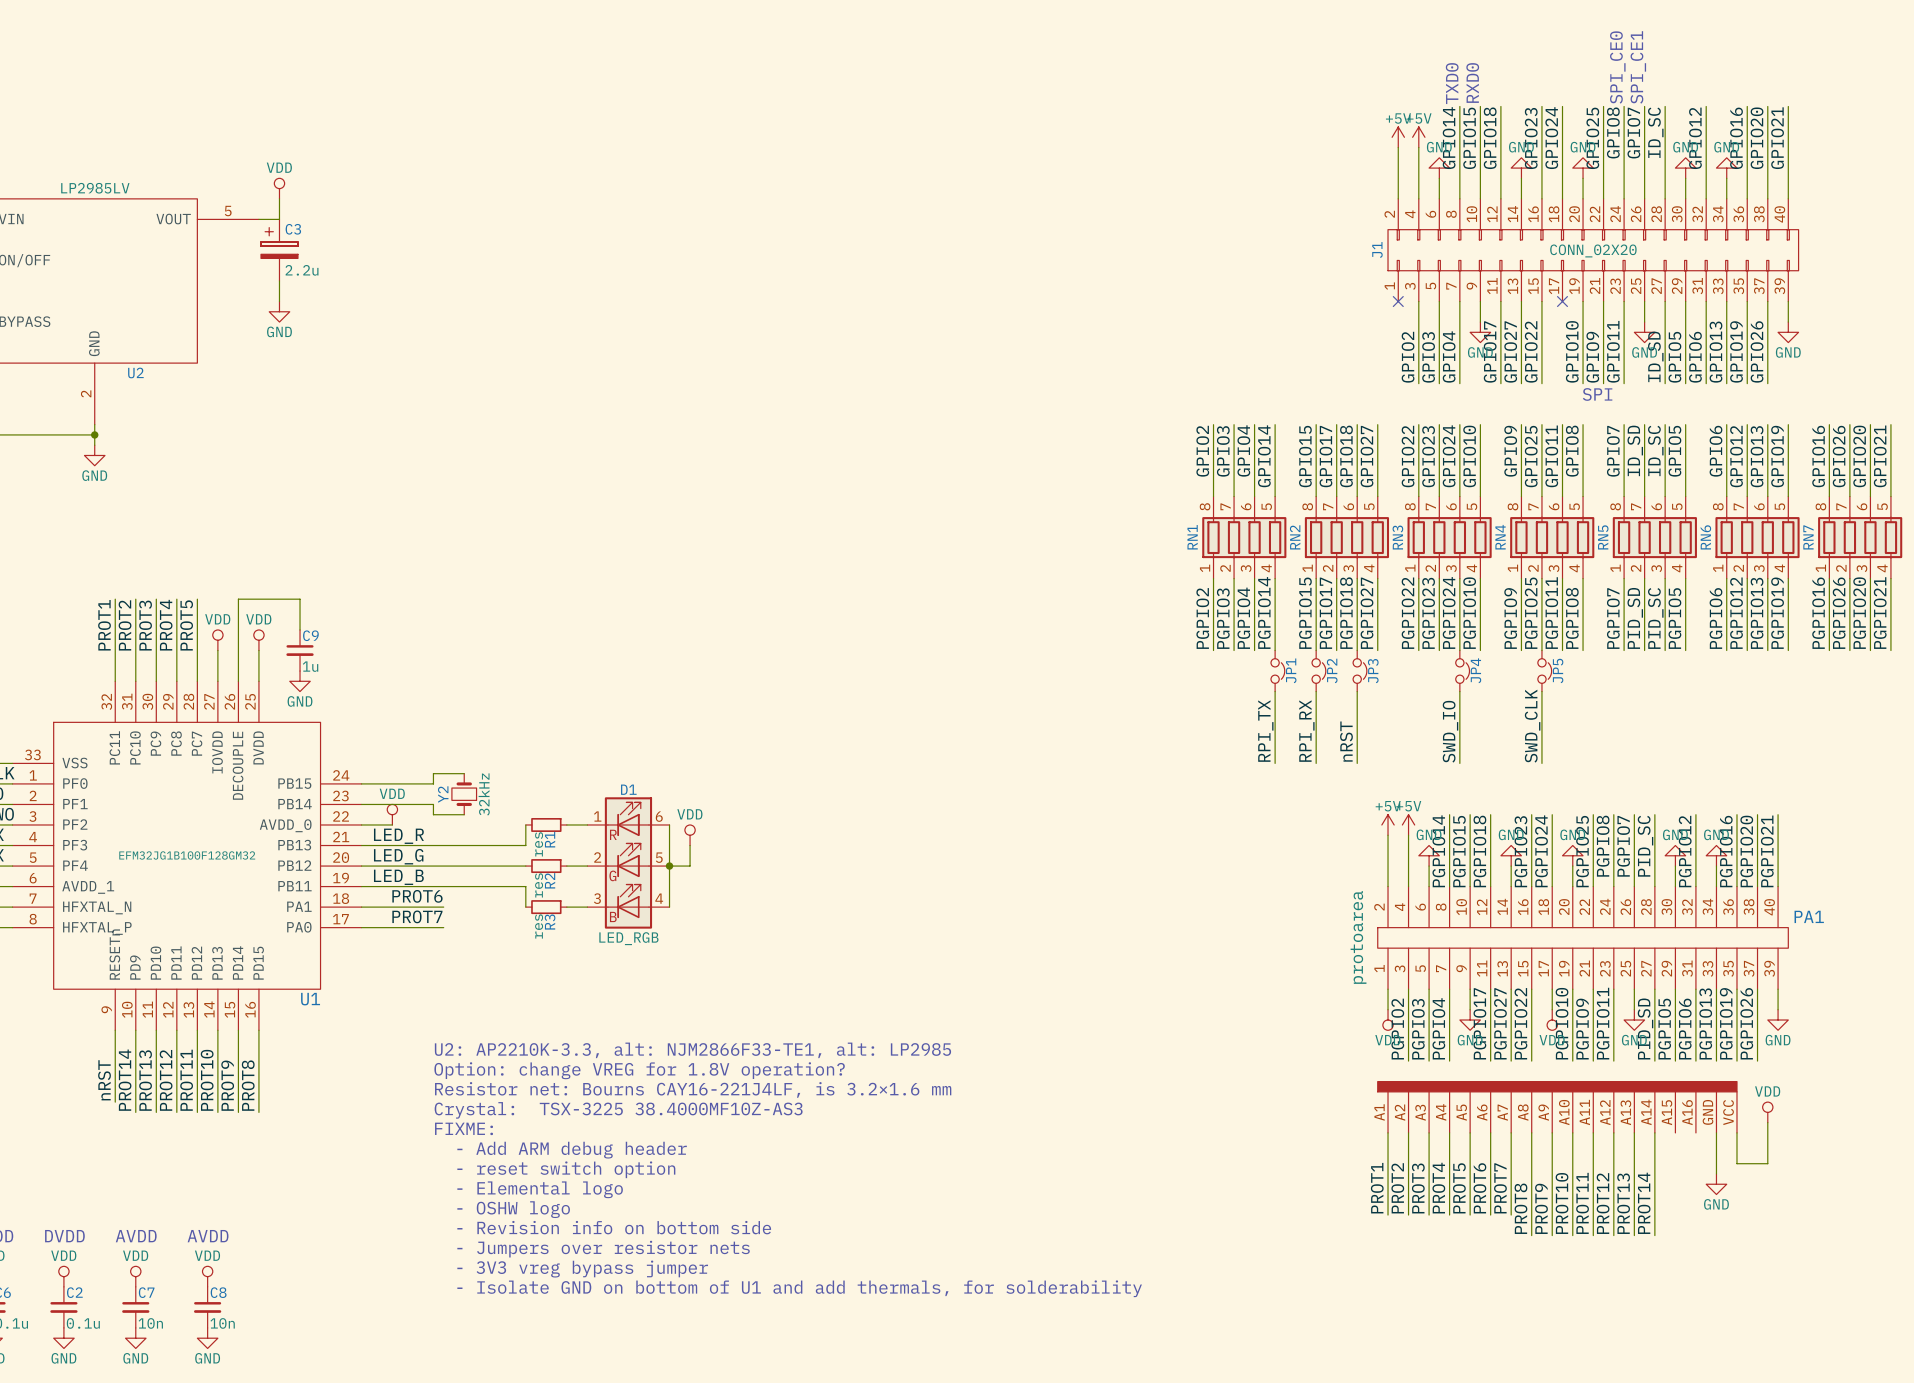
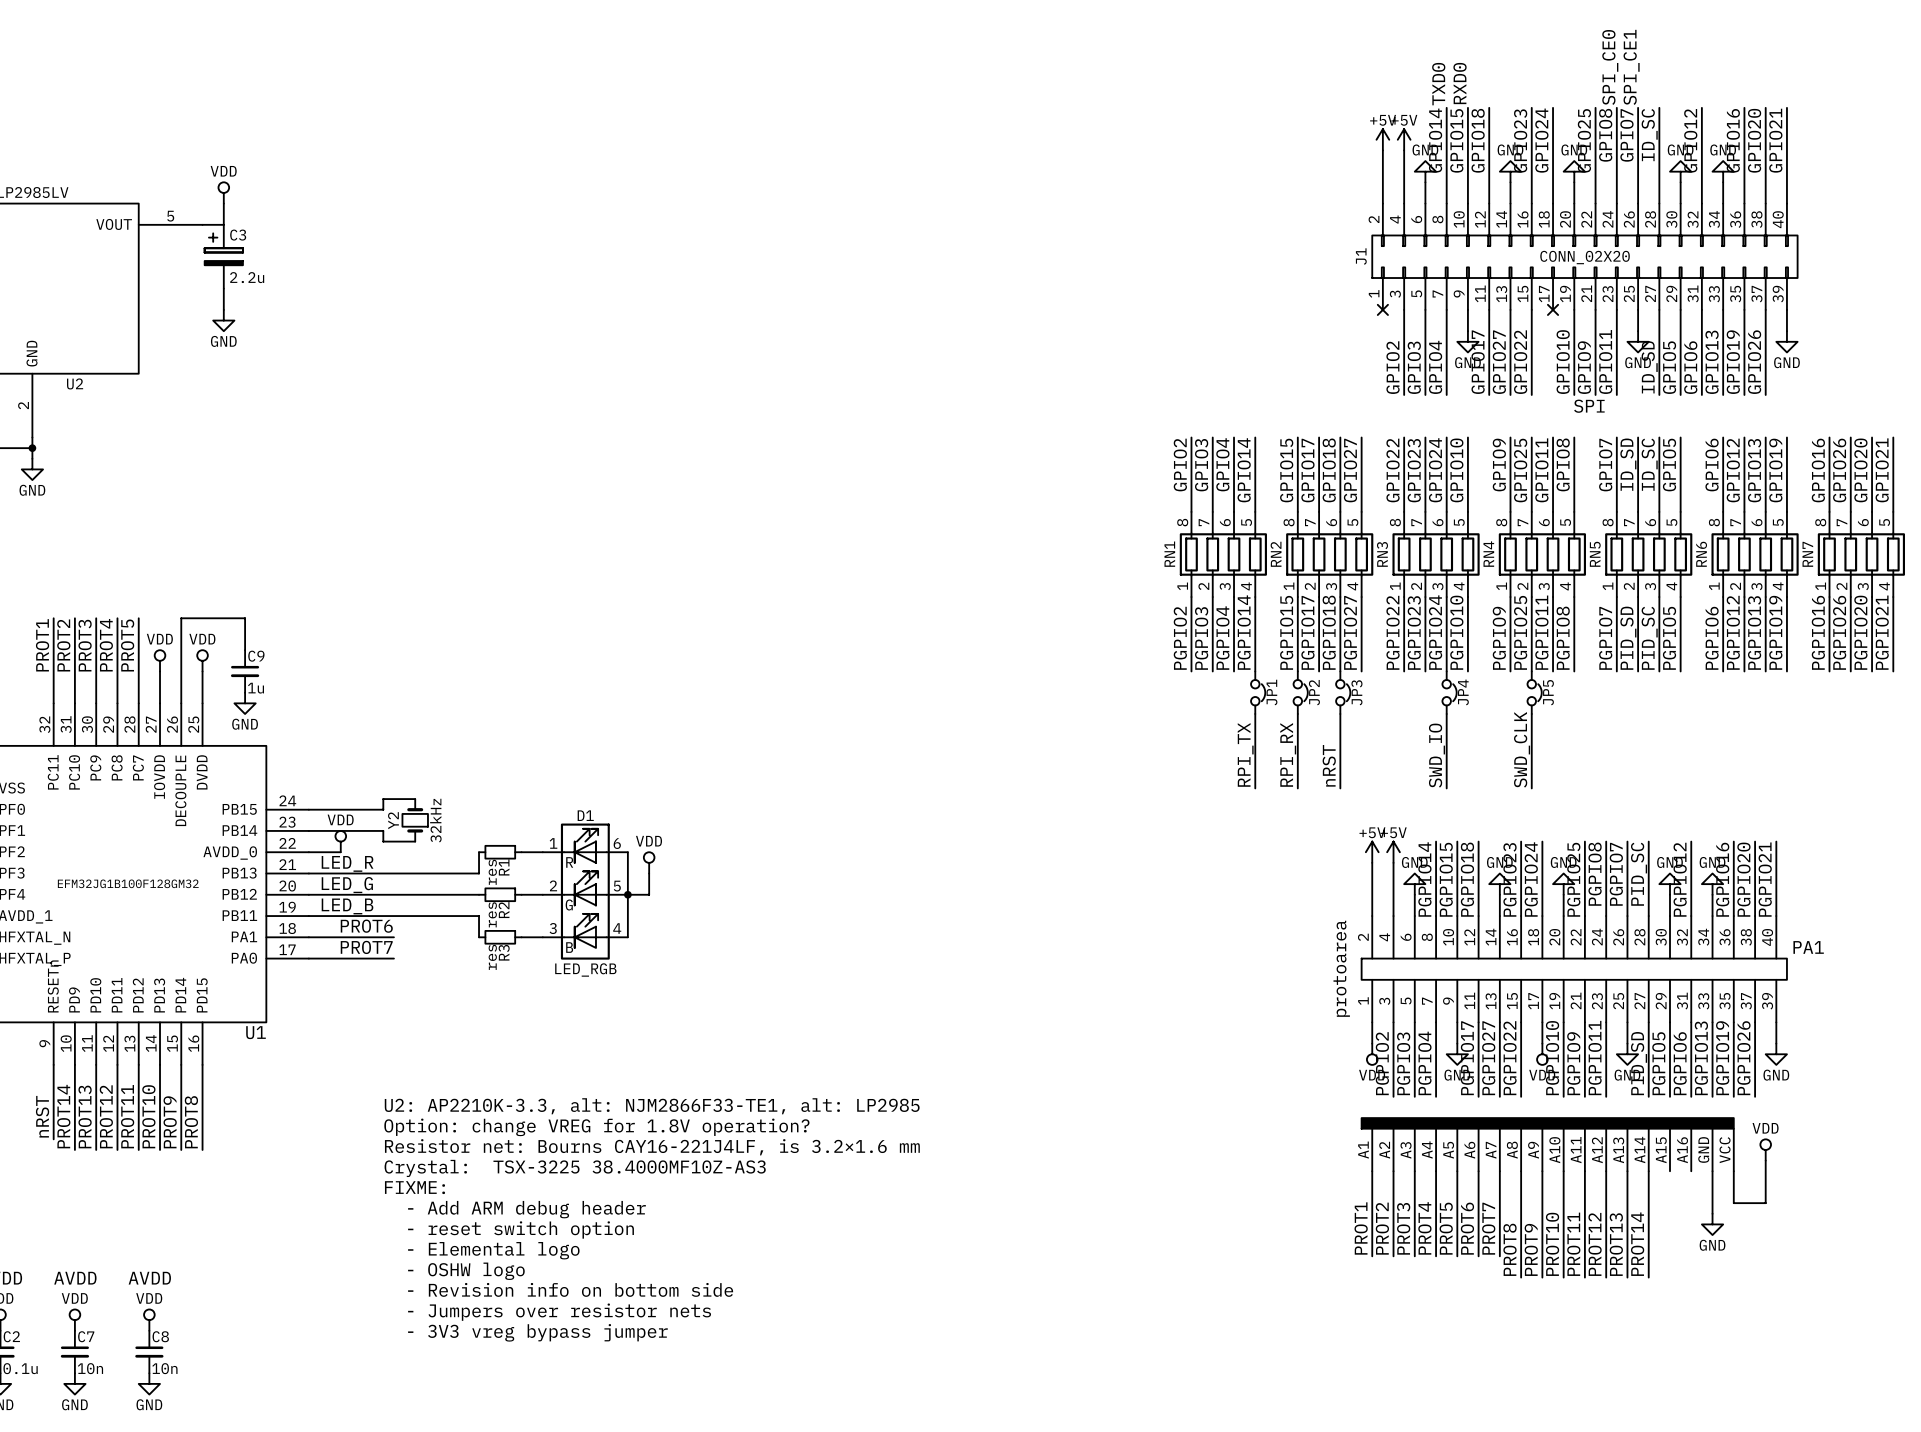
text: U2: AP2210K-3.3, alt: NJM2866F33-TE1, alt: LP2985 (692, 1050) -> none
text: Option: change VREG for 1.8V operation? (639, 1070) -> U2: AP2210K-3.3, alt: NJM2866F33-TE1, alt: LP2985 (652, 1106)
text: Resistor net: Bourns CAY16-221J4LF, is 3.2×1.6 mm (693, 1089) -> Option: change VREG for 1.8V operation? (596, 1127)
text: Crystal: TSX-3225 38.4000MF10Z-AS3 (618, 1110) -> Resistor net: Bourns CAY16-221J4LF, is 3.2×1.6 mm (652, 1147)
text: FIXME: (464, 1128) -> Crystal: TSX-3225 38.4000MF10Z-AS3 (575, 1168)
text: - Add ARM debug header (572, 1150) -> FIXME: (414, 1187)
text: - reset switch option (566, 1169) -> - Add ARM debug header (526, 1209)
text: - Elemental logo (540, 1189) -> - reset switch option (521, 1229)
text: - OSHW logo (513, 1209) -> - Elemental logo (493, 1250)
text: - Revision info on bottom side (614, 1227) -> - OSHW logo (466, 1271)
text: - Jumpers over resistor nets (603, 1249) -> - Revision info on bottom side (570, 1289)
text: - 3V3 vreg bypass jumper (582, 1269) -> - Jumpers over resistor nets (559, 1312)
text: - Isolate GND on bottom of U1 and add thermals, for solderability (799, 1288) -> - 3V3 vreg bypass jumper (537, 1332)

